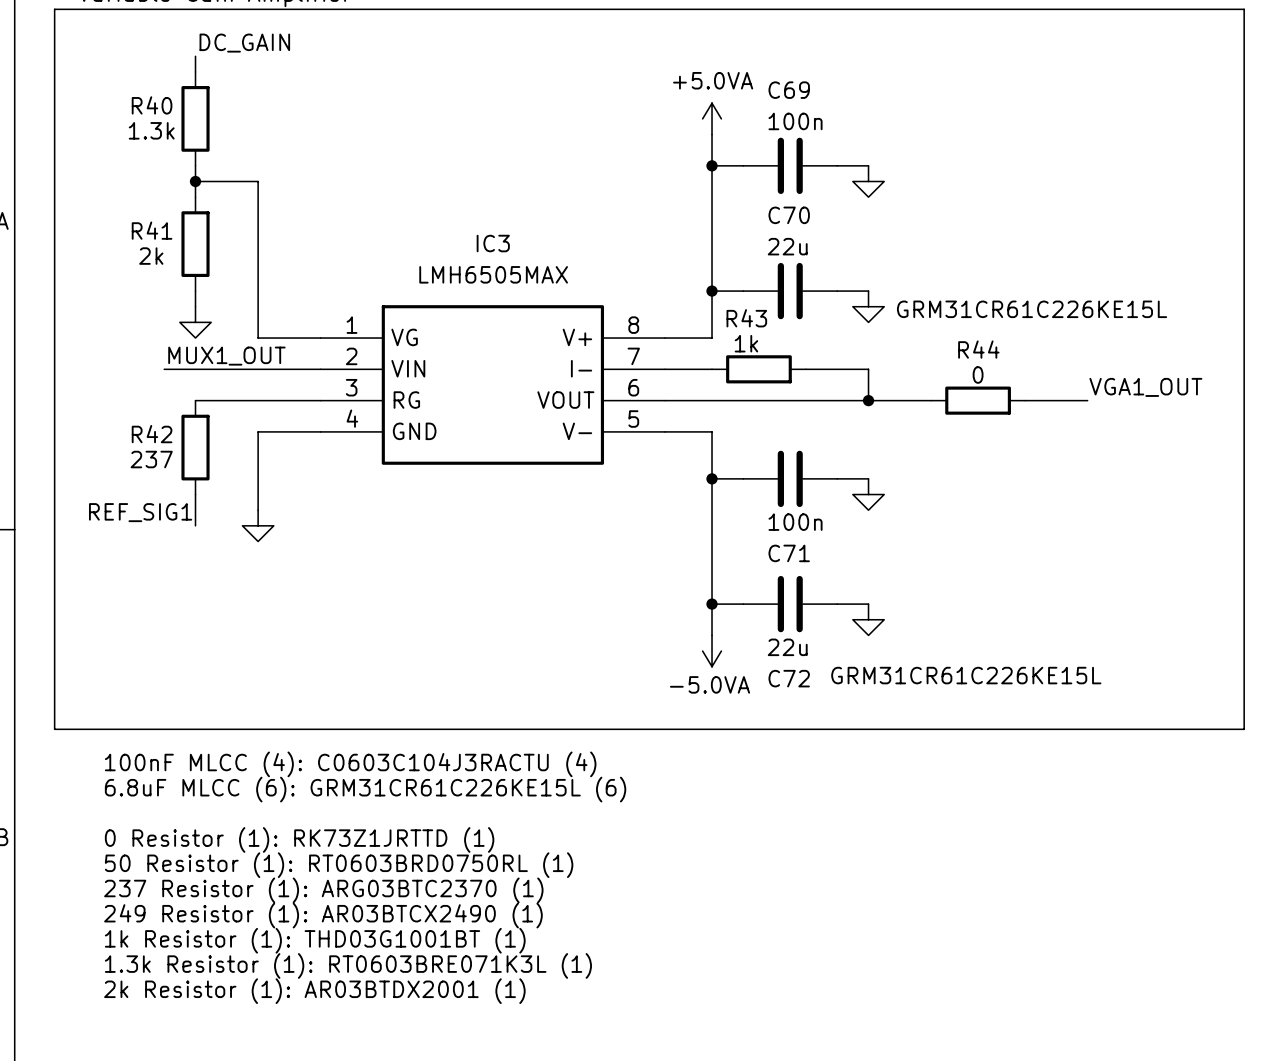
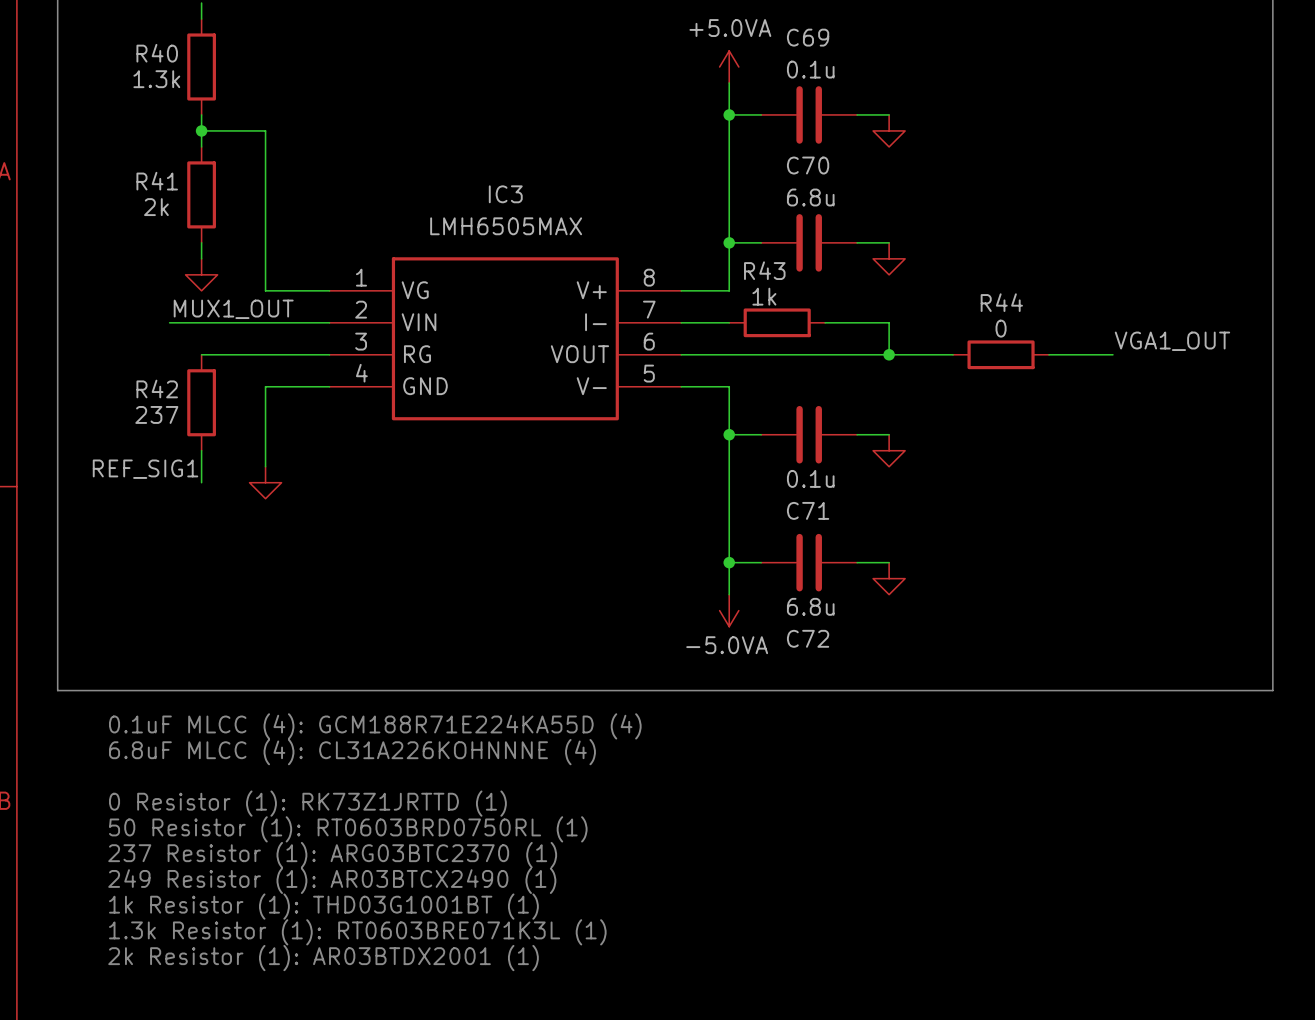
C69 value: 100n (795, 121) -> 0.1u (810, 69)
C70 value: 22u (787, 246) -> 6.8u (810, 197)
text: GRM31CR61C226KE15L (1032, 309) -> none
C71 value: 100n (795, 522) -> 0.1u (810, 478)
C72 value: 22u (787, 647) -> 6.8u (810, 606)
text: GRM31CR61C226KE15L (966, 675) -> none
text: 100nF MLCC (4): C0603C104J3RACTU (4) (350, 764) -> 0.1uF MLCC (4): GCM188R71E224KA55D (4) (375, 726)
text: 6.8uF MLCC (6): GRM31CR61C226KE15L (6) (365, 789) -> 6.8uF MLCC (4): CL31A226KOHNNNE (4) (352, 752)

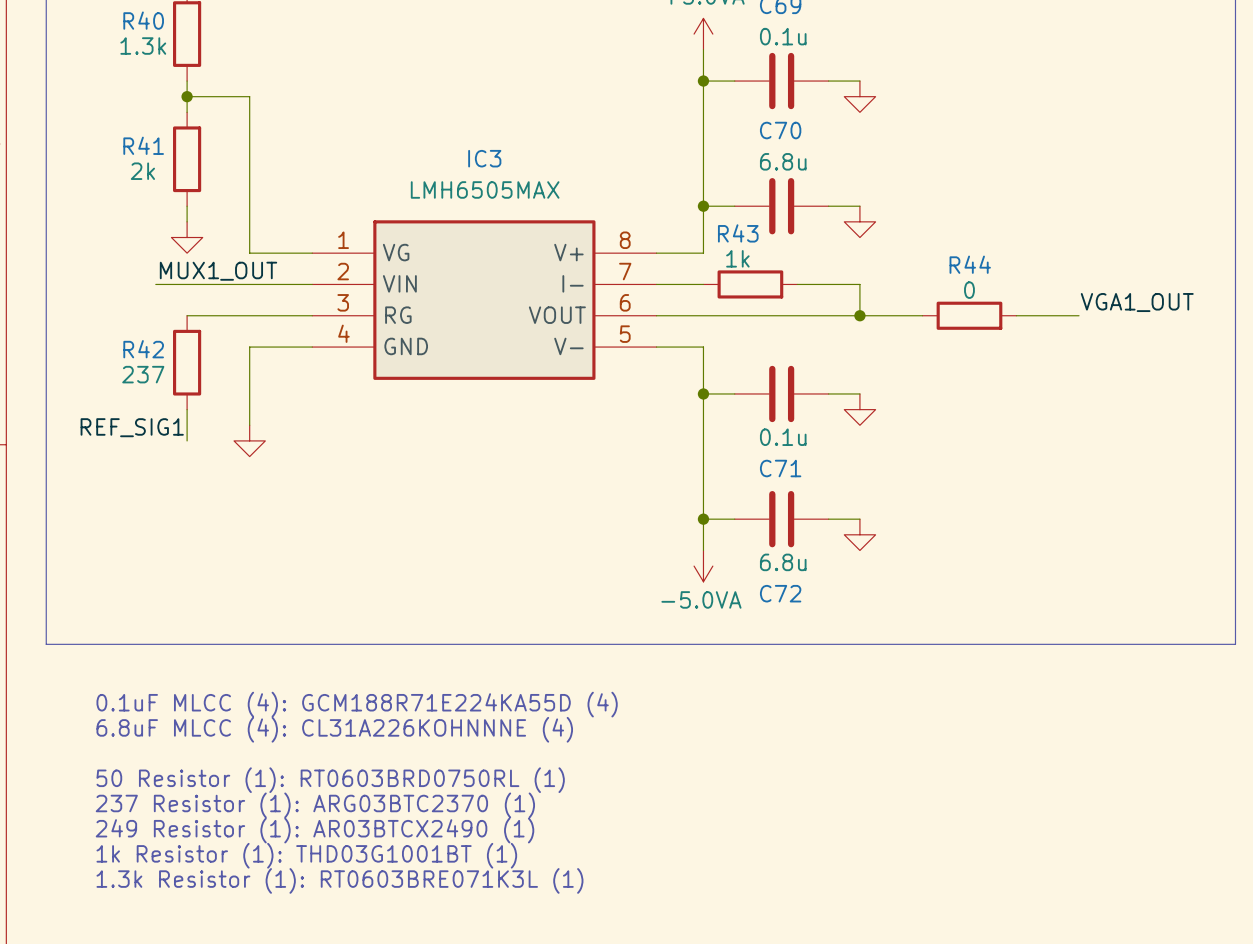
text: 0.1uF MLCC (4): GCM188R71E224KA55D (4) (375, 726) -> none
text: 6.8uF MLCC (4): CL31A226KOHNNNE (4) (352, 752) -> 0.1uF MLCC (4): GCM188R71E224KA55D (4) (357, 704)
text: none -> 6.8uF MLCC (4): CL31A226KOHNNNE (4) (334, 729)
text: 0 Resistor (1): RK73Z1JRTTD (1) (307, 803) -> none
text: 2k Resistor (1): AR03BTDX2001 (1) (323, 958) -> none

